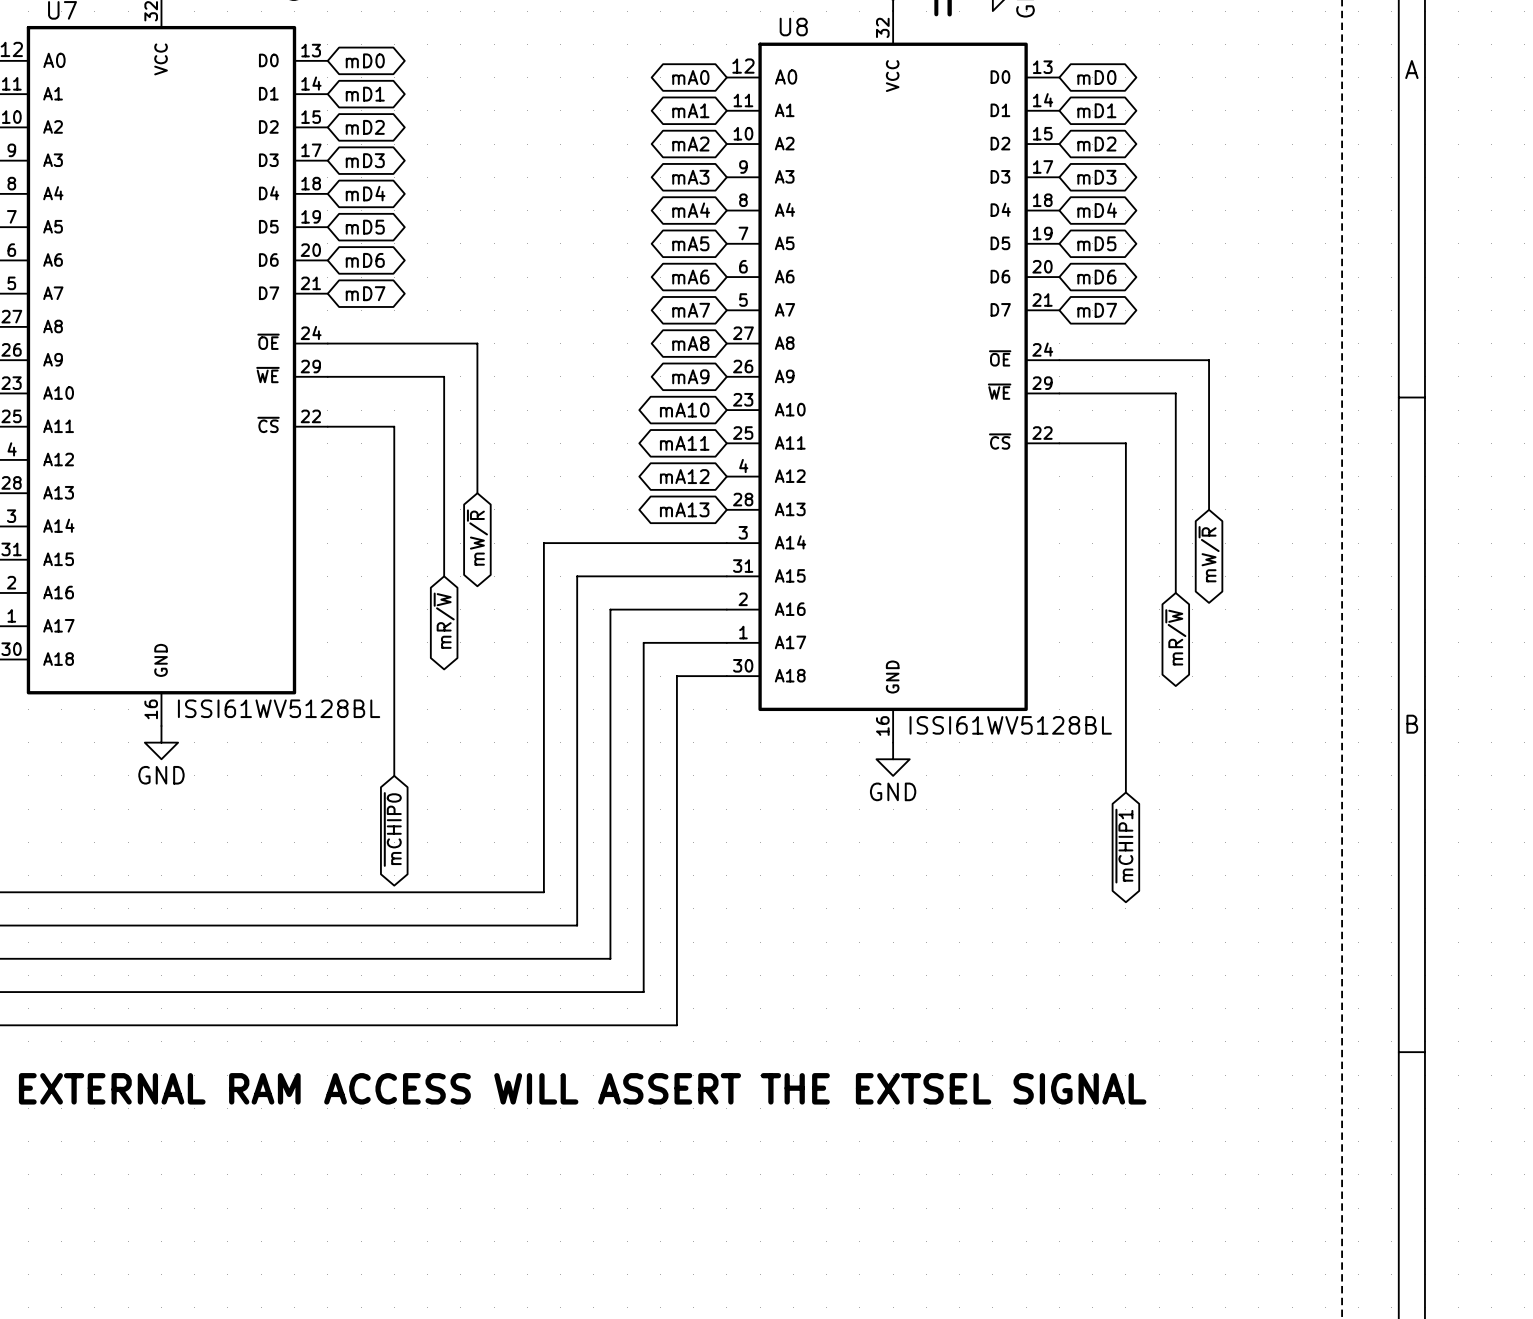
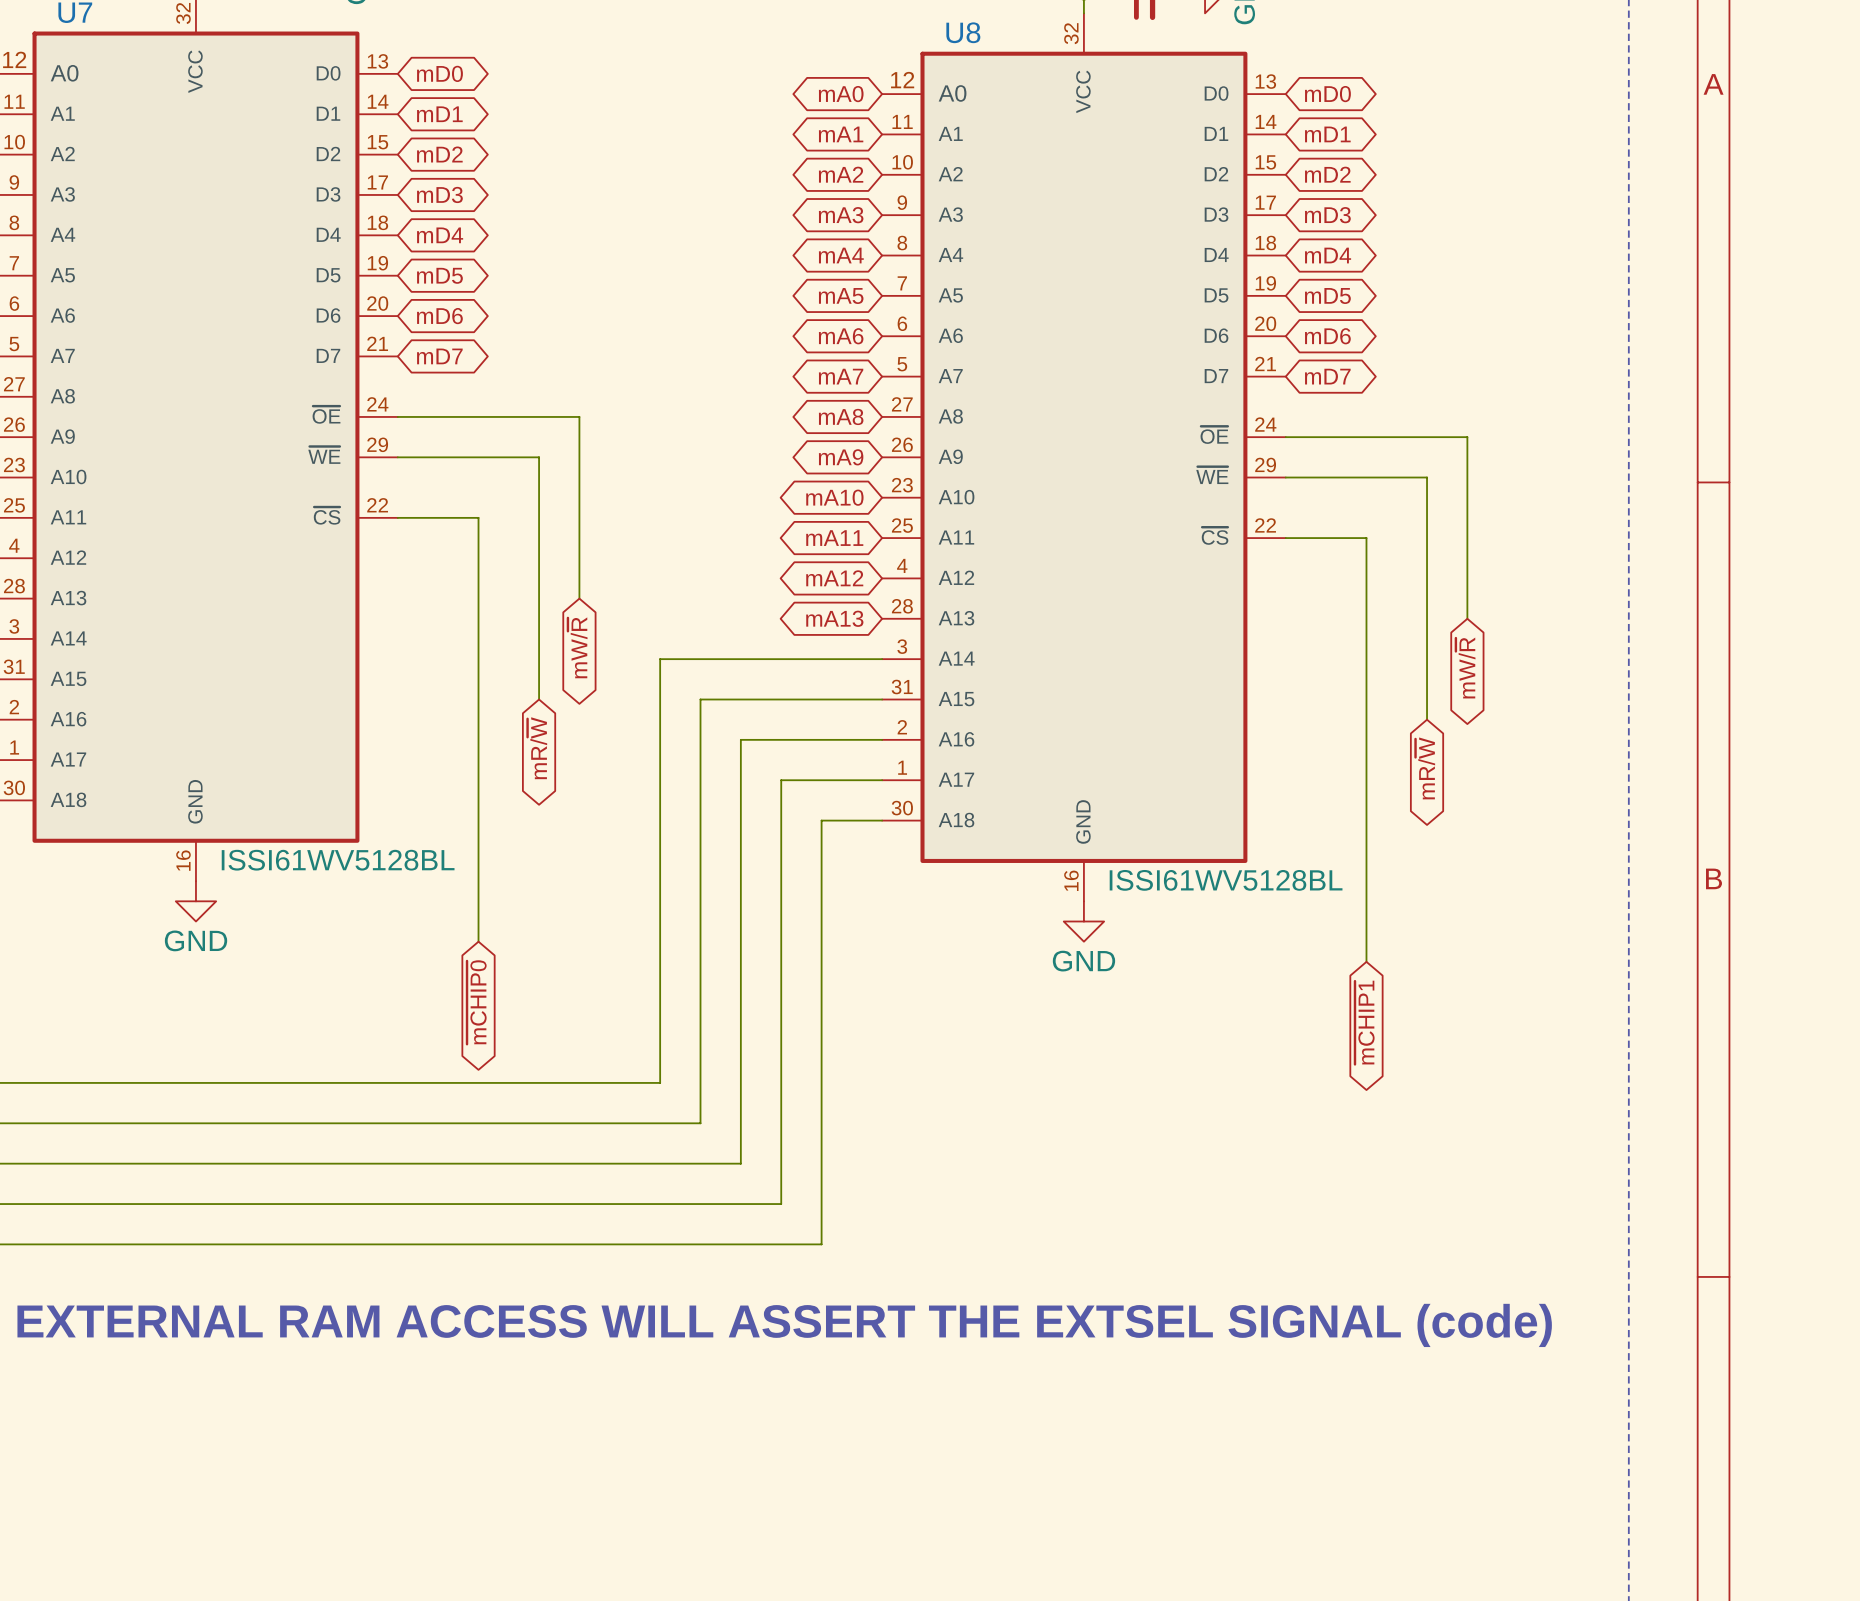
text: EXTERNAL RAM ACCESS WILL ASSERT THE EXTSEL SIGNAL (582, 1088) -> EXTERNAL RAM ACCESS WILL ASSERT THE EXTSEL SIGNAL (code) (784, 1325)

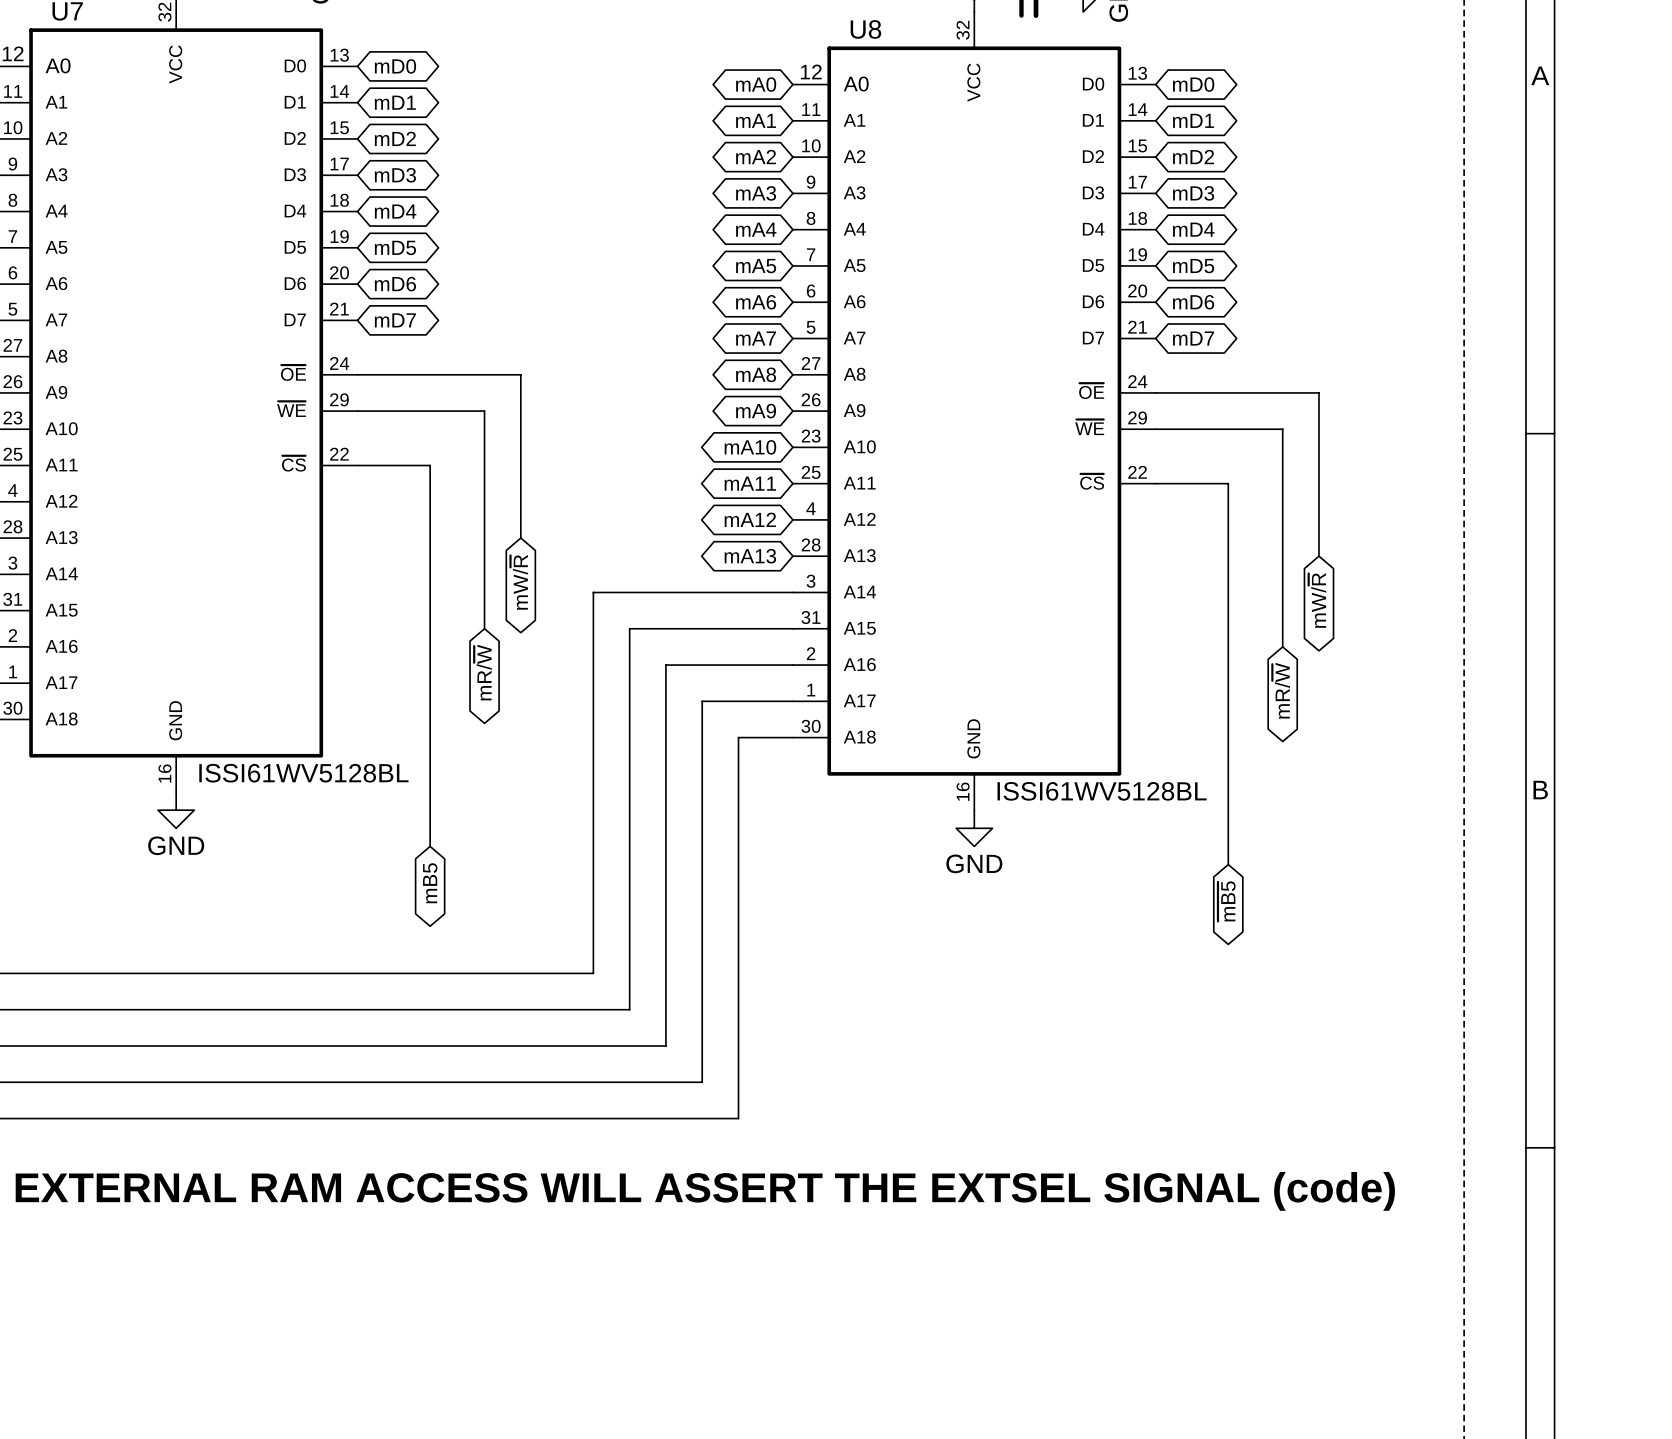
global label: ~{mCHIP0} (476, 1002) -> mB5 (430, 883)
global label: ~{mCHIP1} (1364, 1022) -> ~{mB5} (1226, 901)

